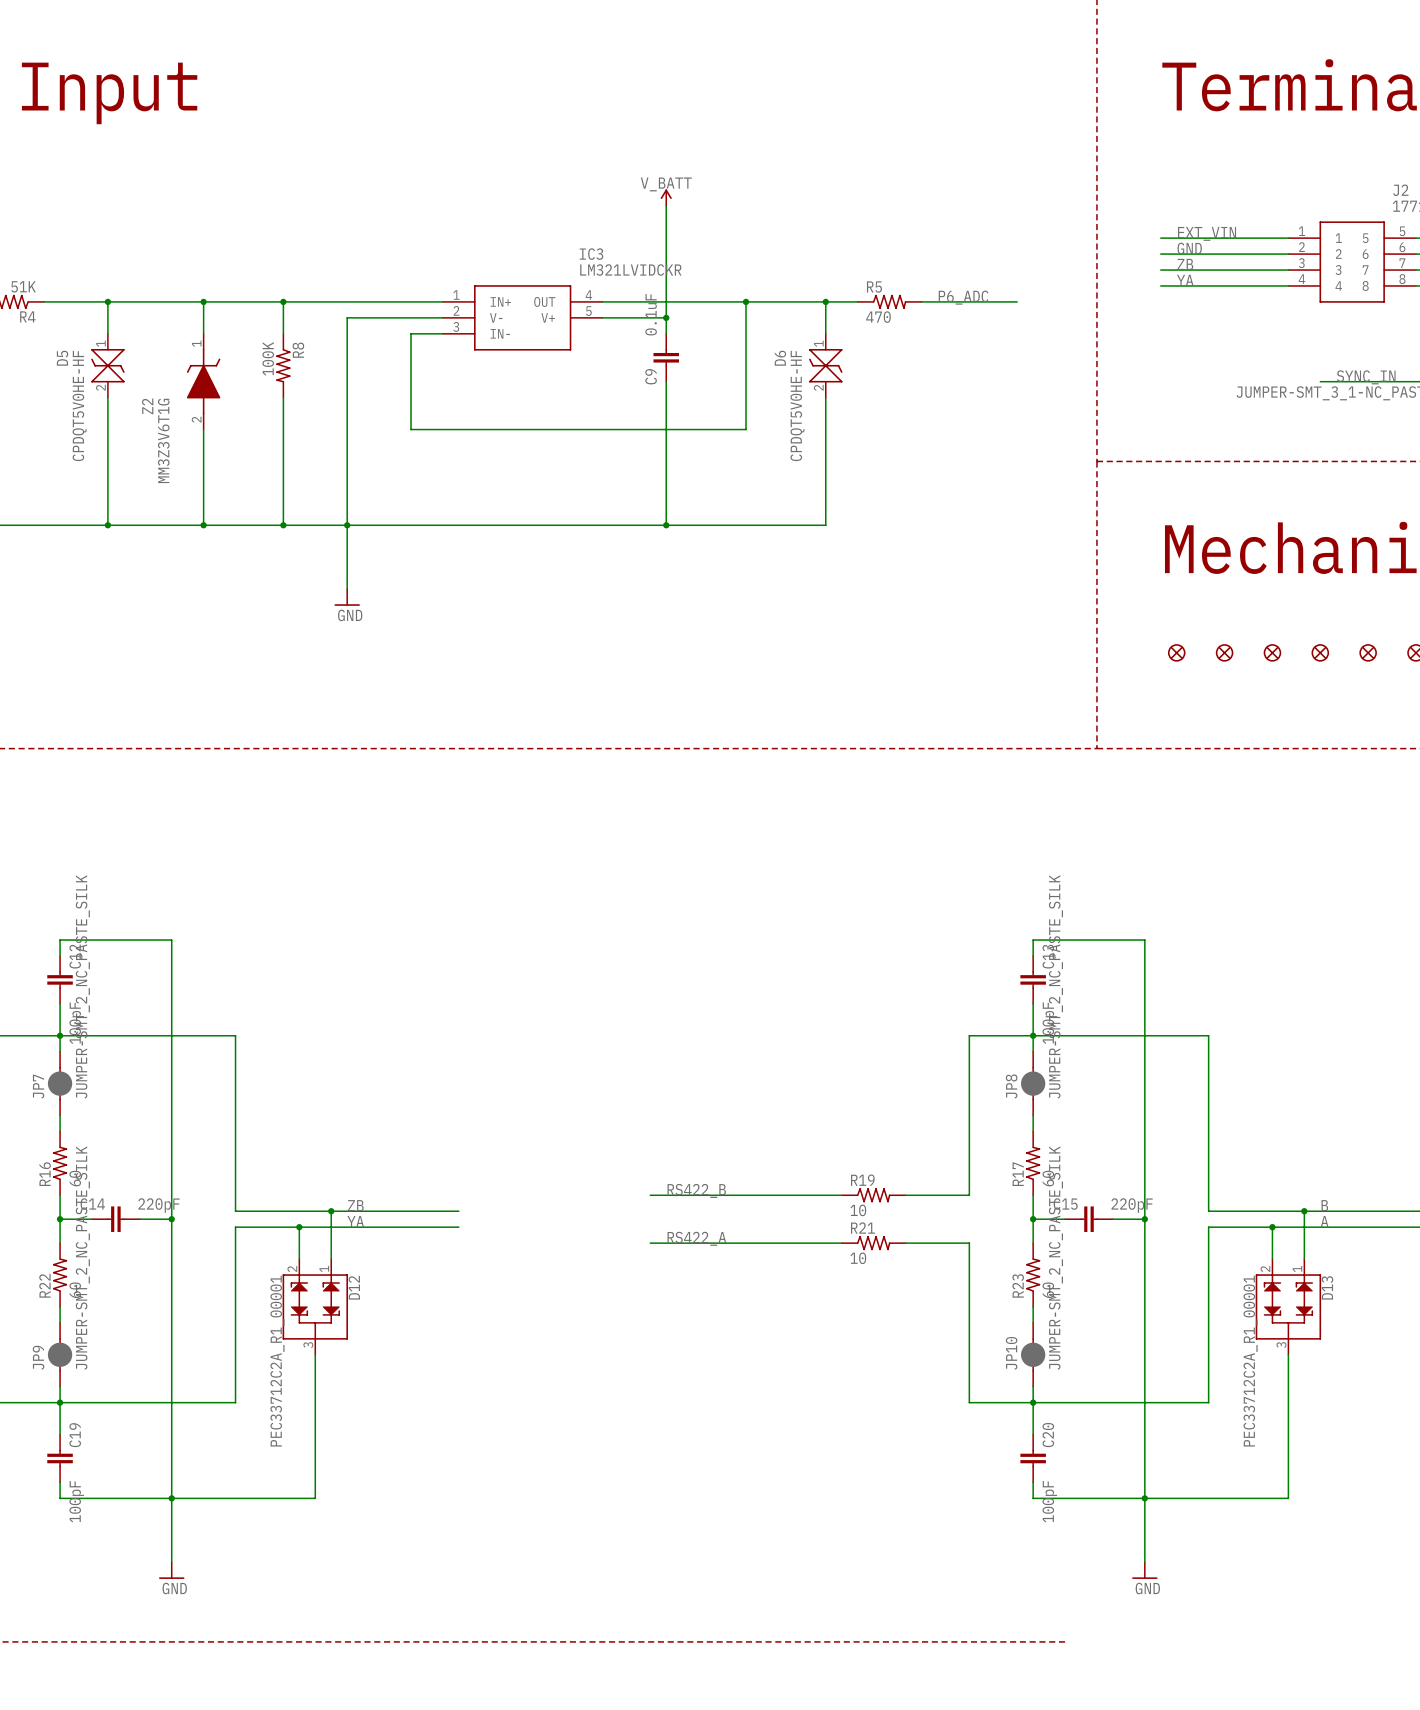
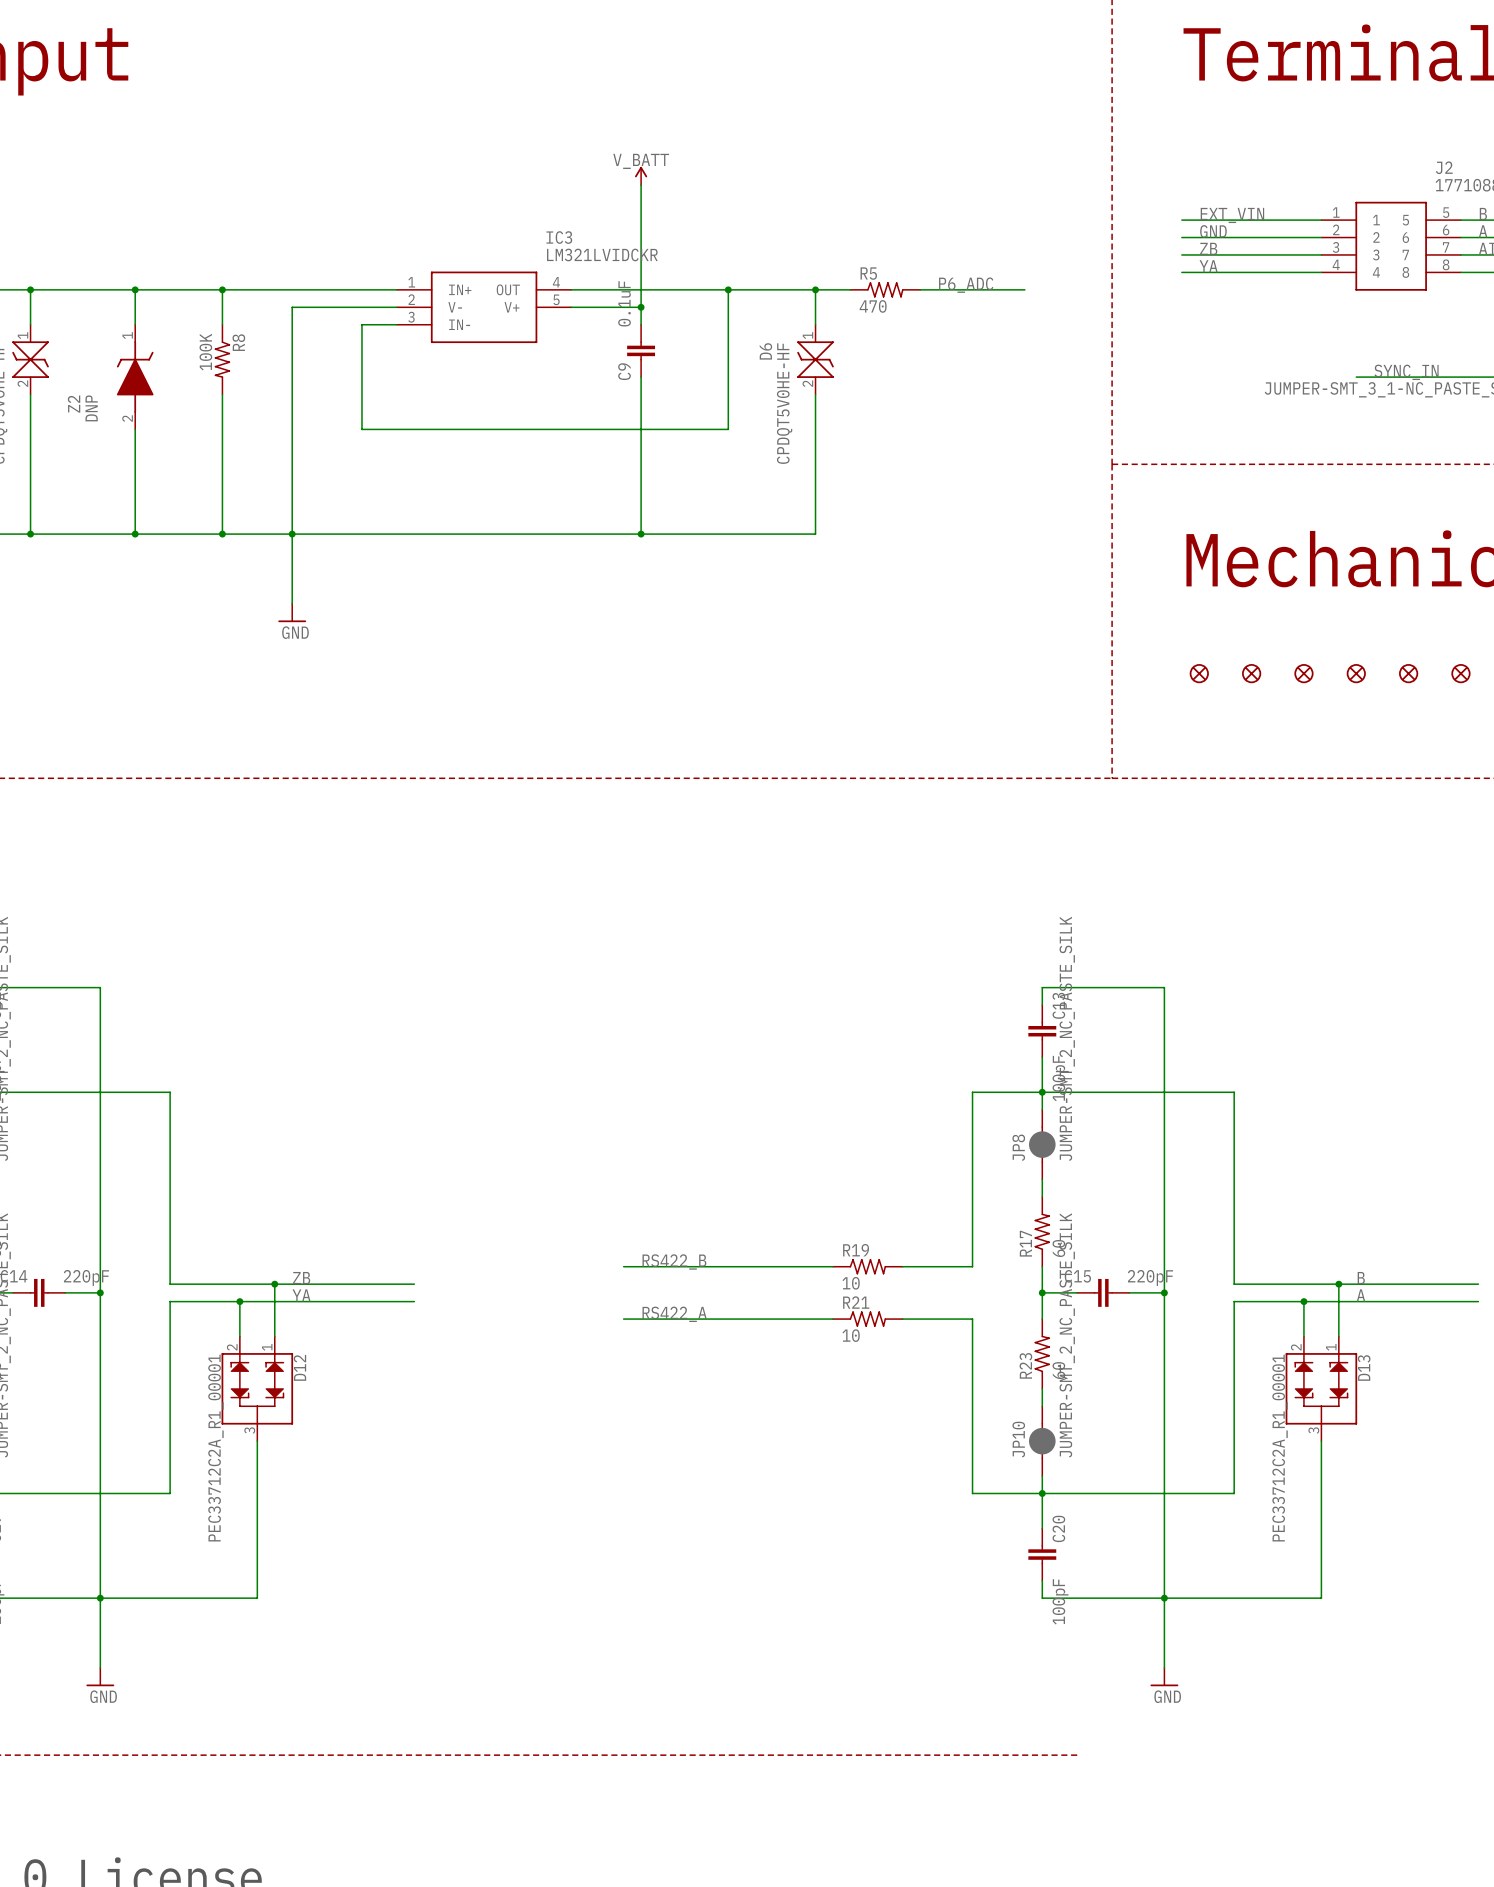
Z2 value: MM3Z3V6T1G (163, 440) -> DNP (91, 408)

